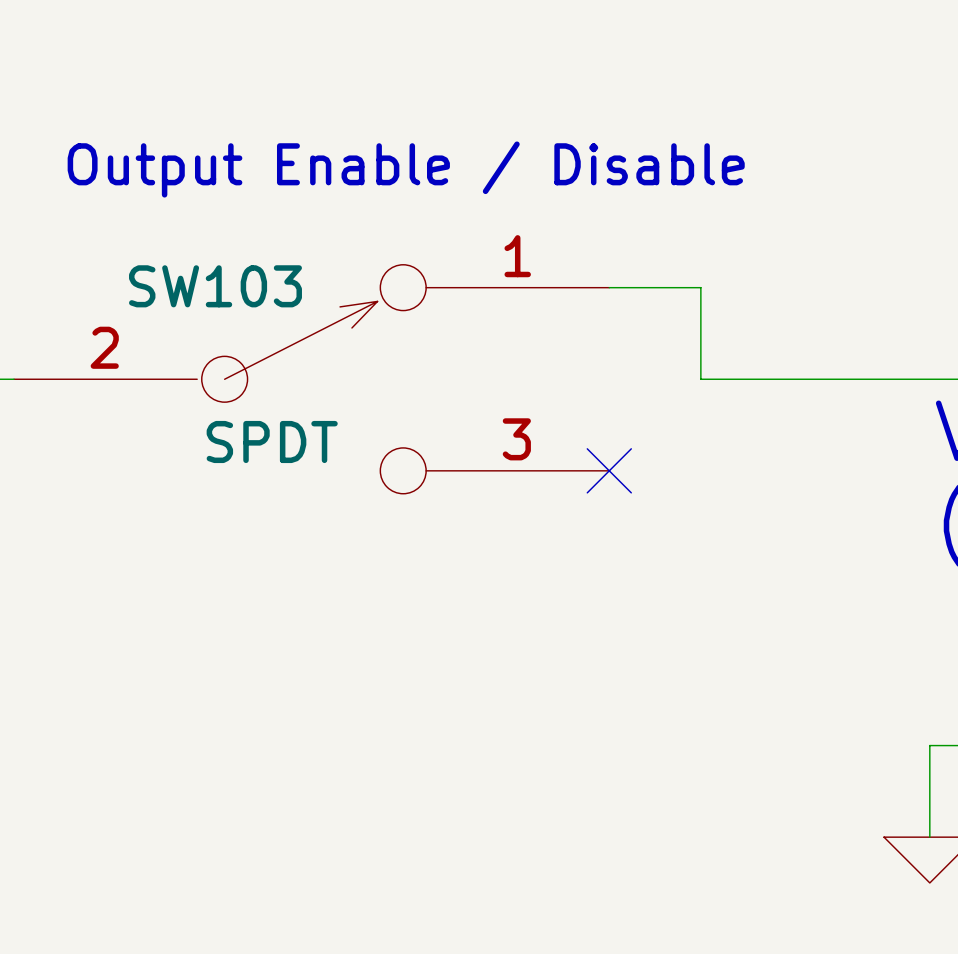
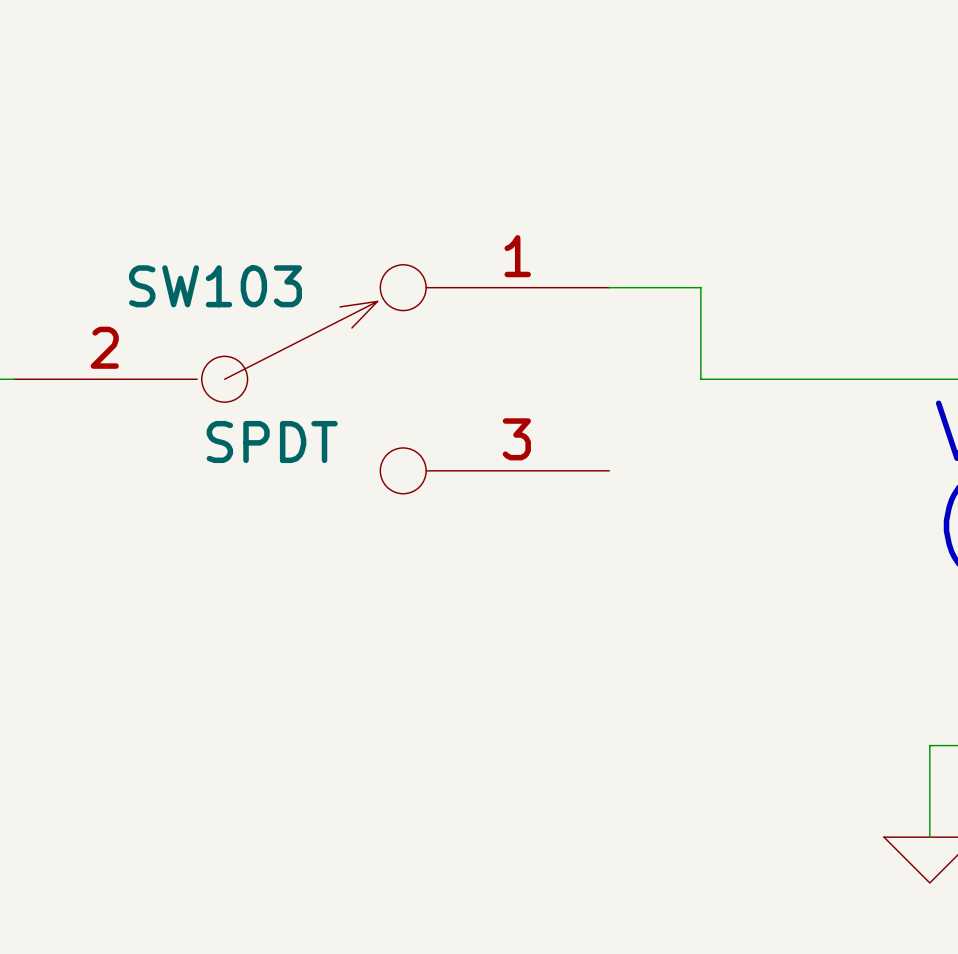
text: Output Enable / Disable (406, 169) -> none
no-connect mark: (609, 470) -> none

